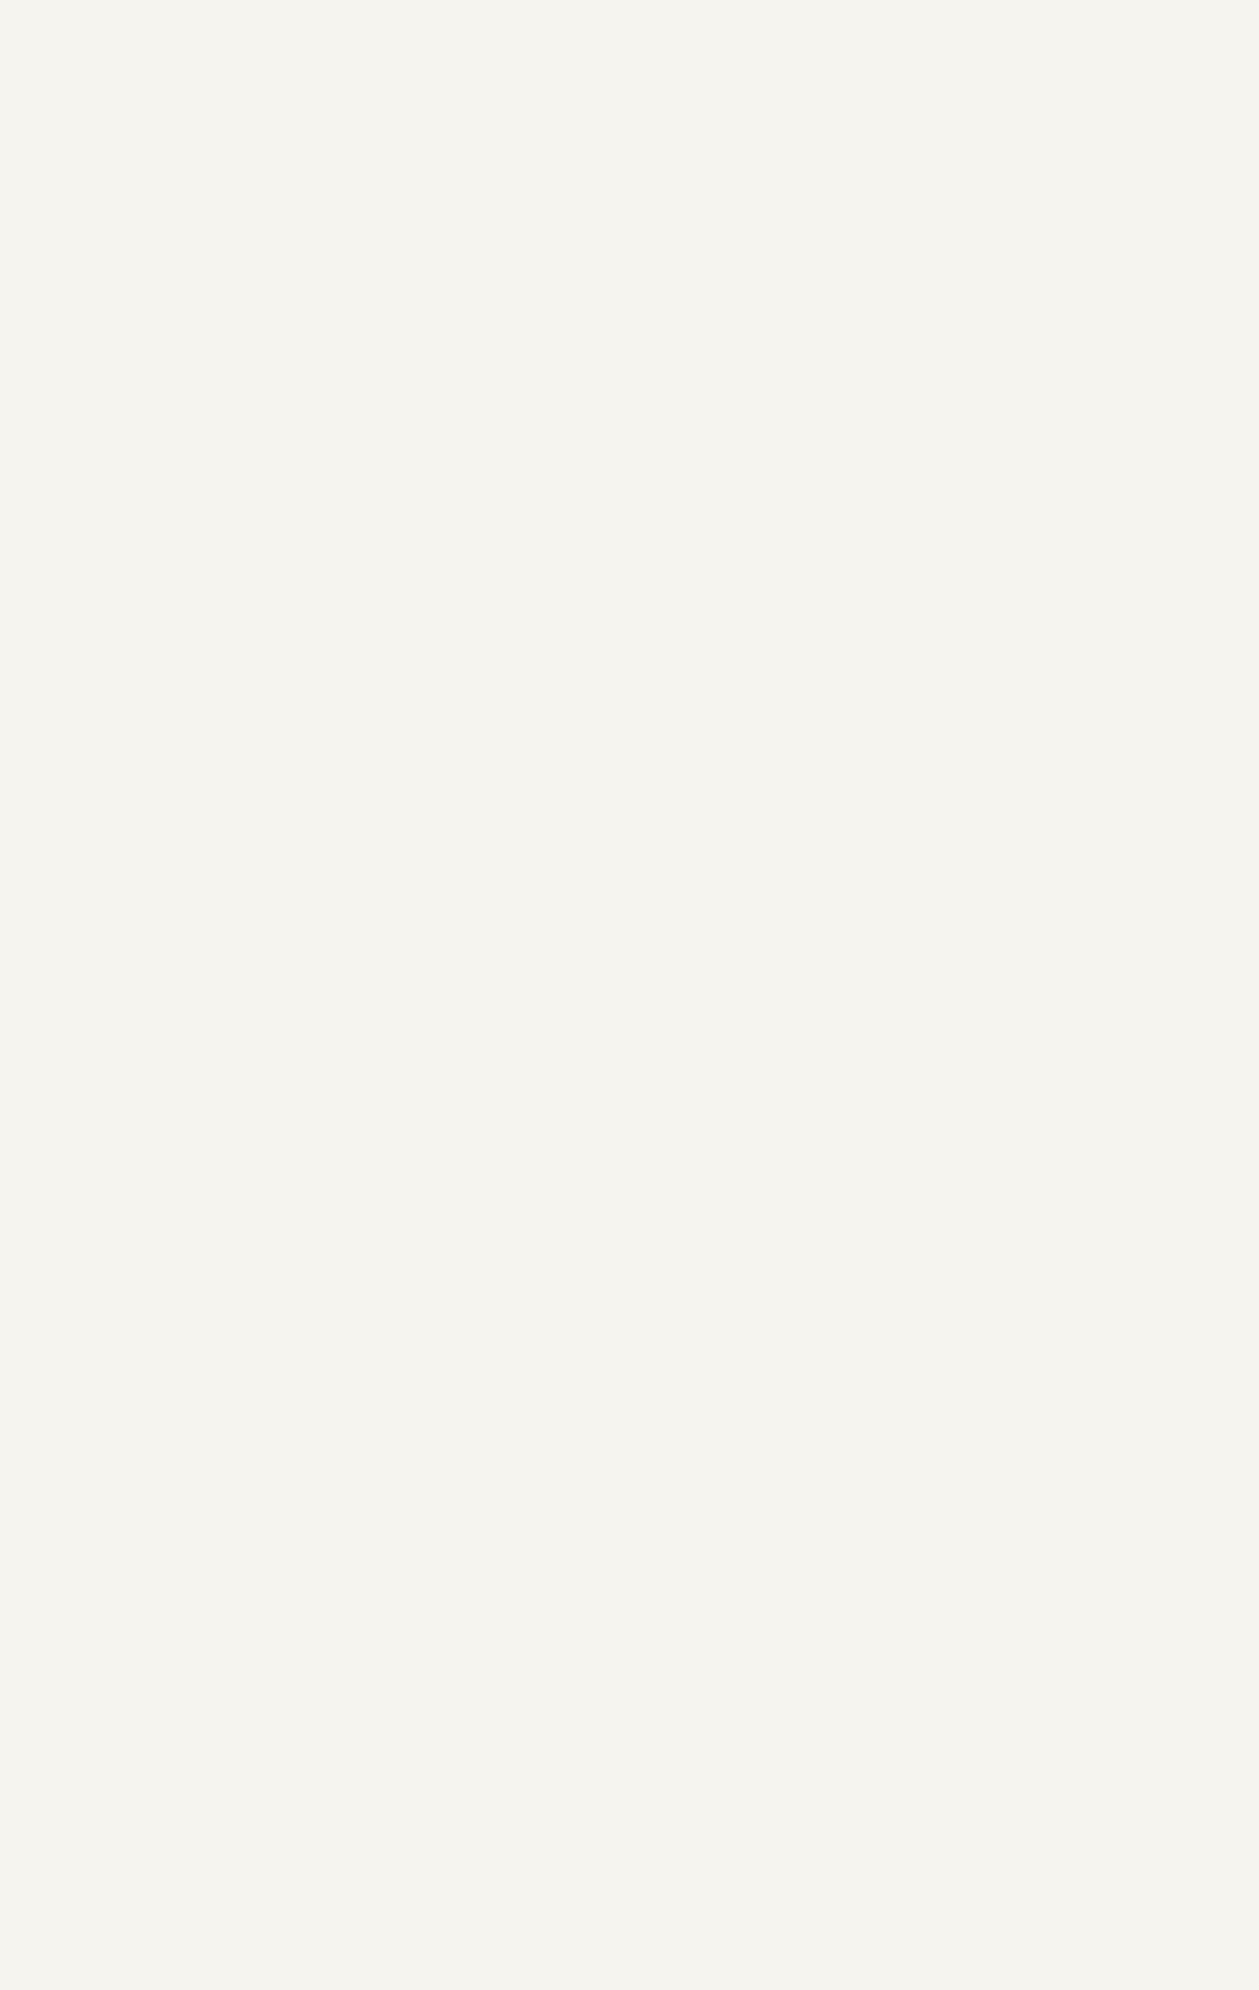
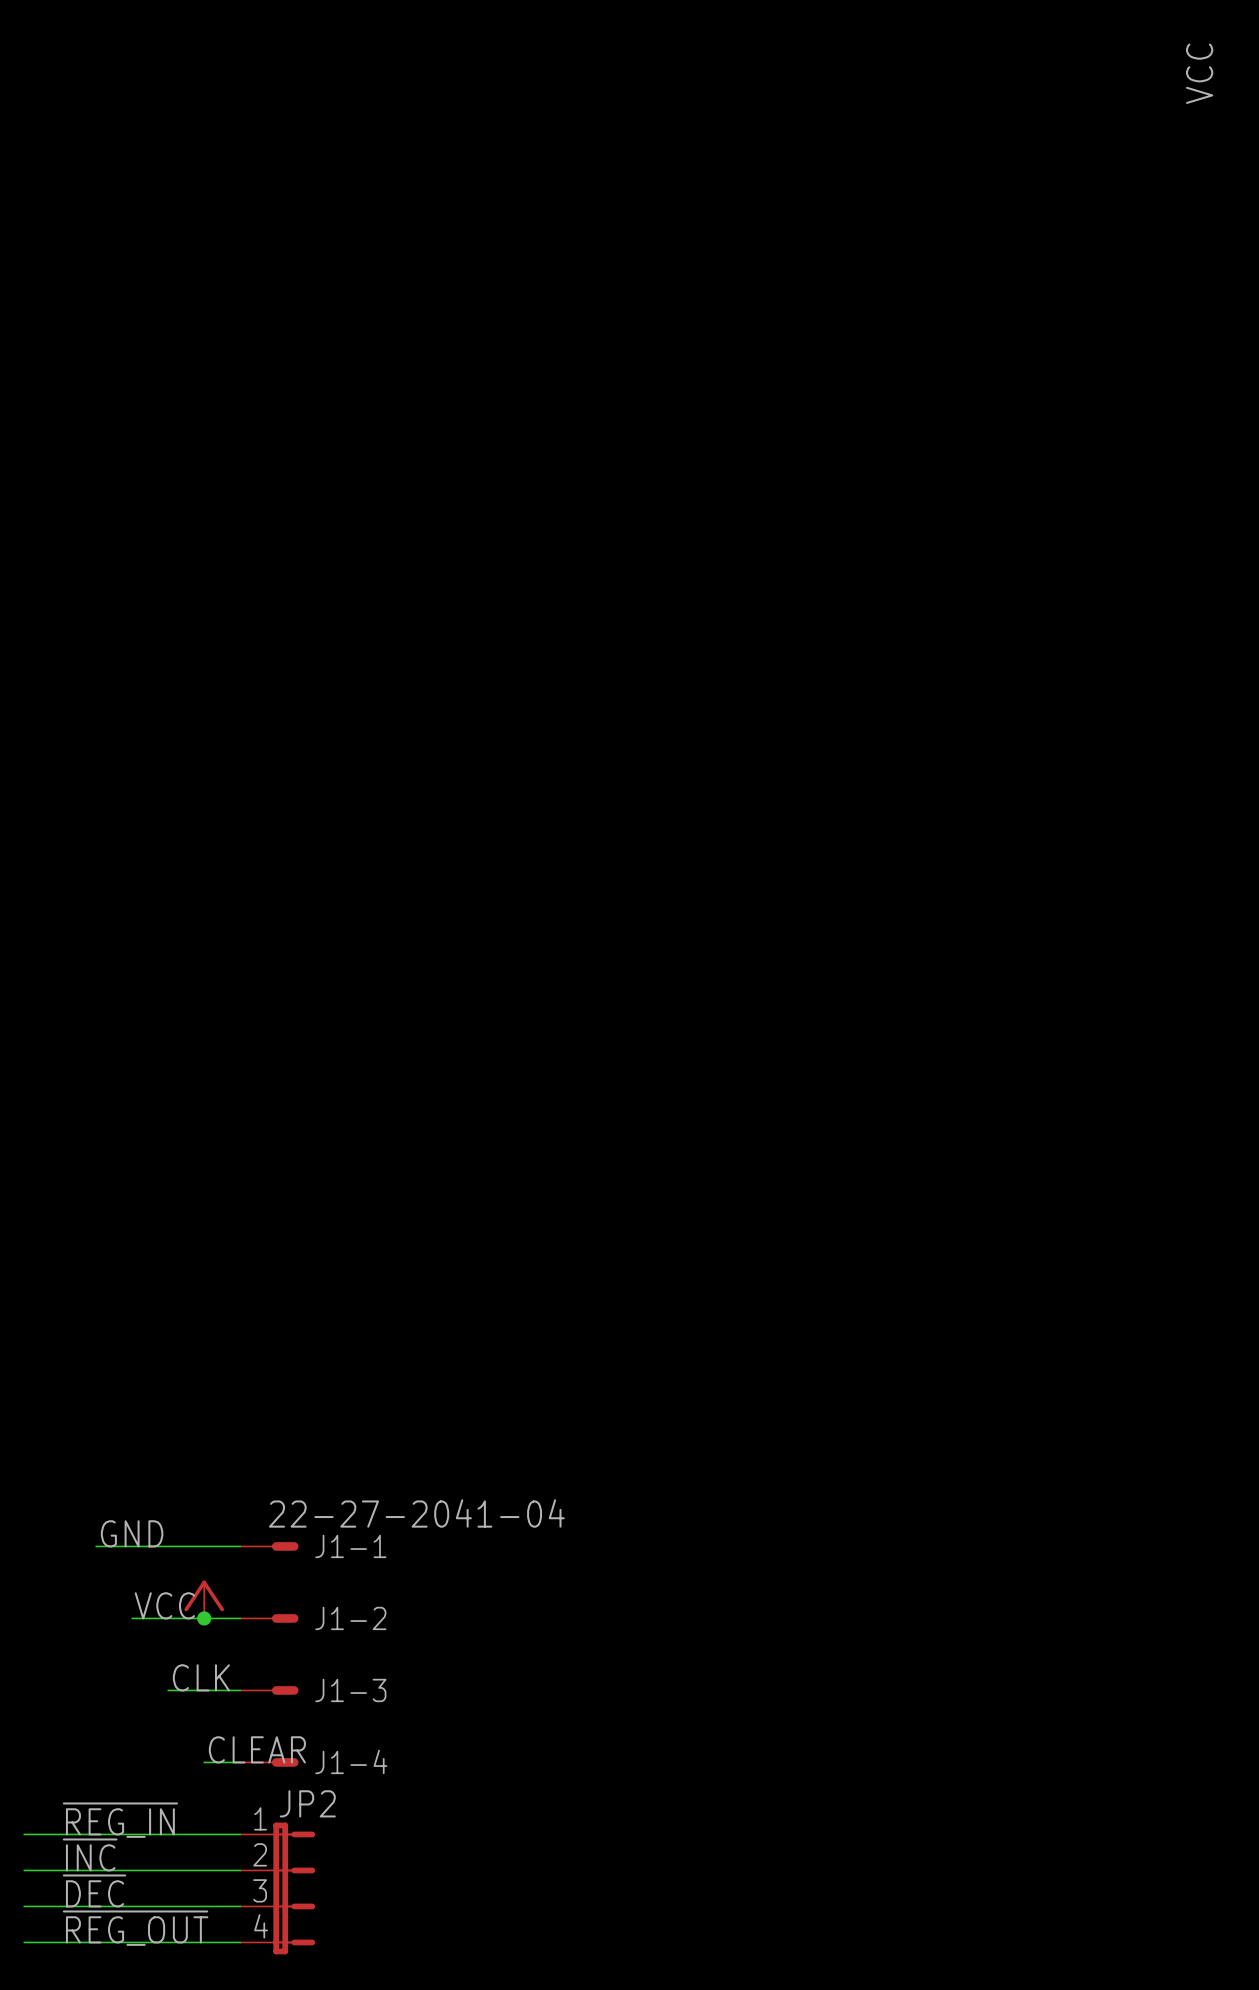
label: none -> GND (132, 1533)
wire: none -> (96, 1546) (240, 1546)
J1-1: none -> 22-27-2041-04 (269, 1546)
power symbol: none -> VCC (204, 1599)
label: none -> VCC (164, 1605)
wire: none -> (132, 1618) (240, 1618)
junction: none -> (204, 1618)
J1-2: none -> (269, 1618)
label: none -> CLK (201, 1677)
wire: none -> (168, 1690) (240, 1690)
J1-3: none -> (269, 1690)
label: none -> CLEAR (257, 1749)
wire: none -> (204, 1762) (240, 1762)
J1-4: none -> (269, 1762)
label: none -> ~{REG_IN} (120, 1820)
wire: none -> (24, 1834) (240, 1834)
label: none -> ~{INC} (90, 1854)
wire: none -> (24, 1870) (240, 1870)
JP2: none -> (277, 1888)
label: none -> ~{DEC} (94, 1890)
wire: none -> (24, 1906) (240, 1906)
label: none -> ~{REG_OUT} (135, 1928)
wire: none -> (24, 1942) (240, 1942)

